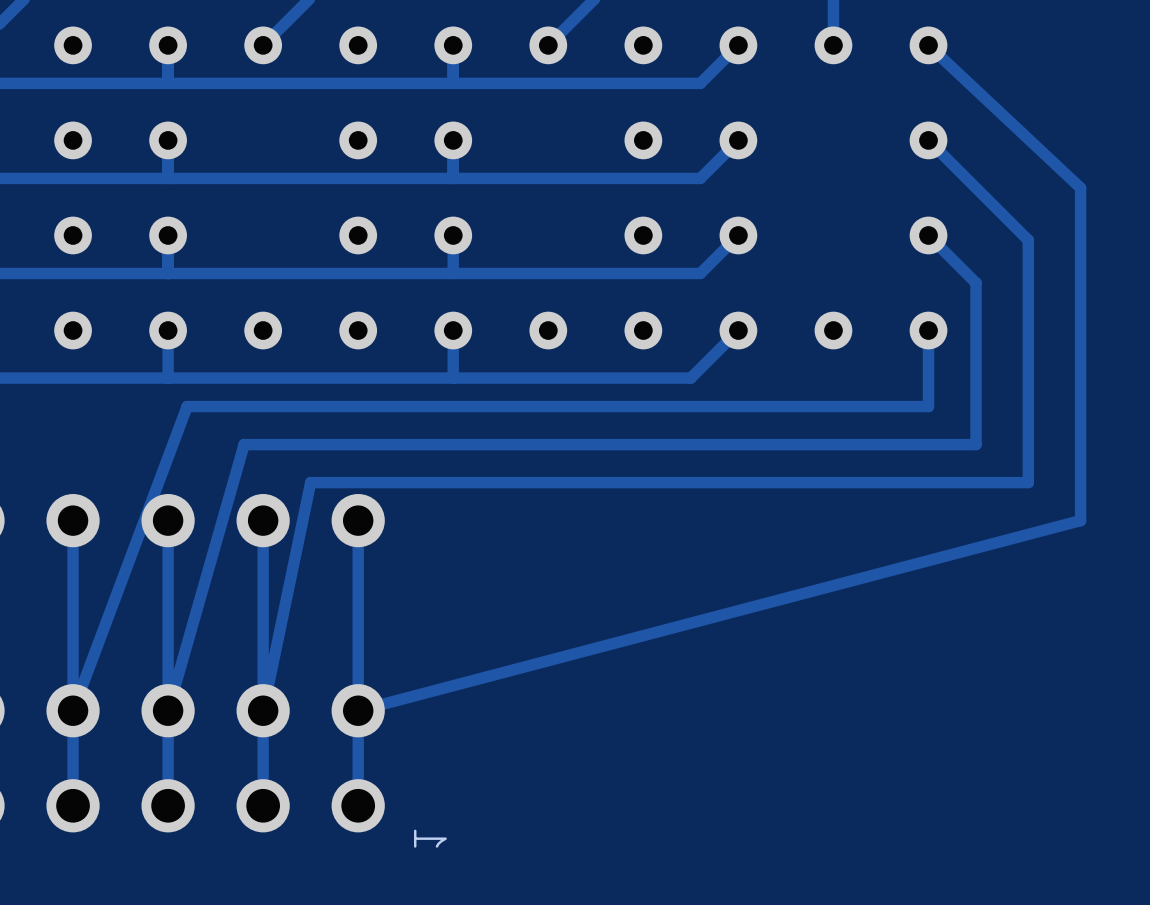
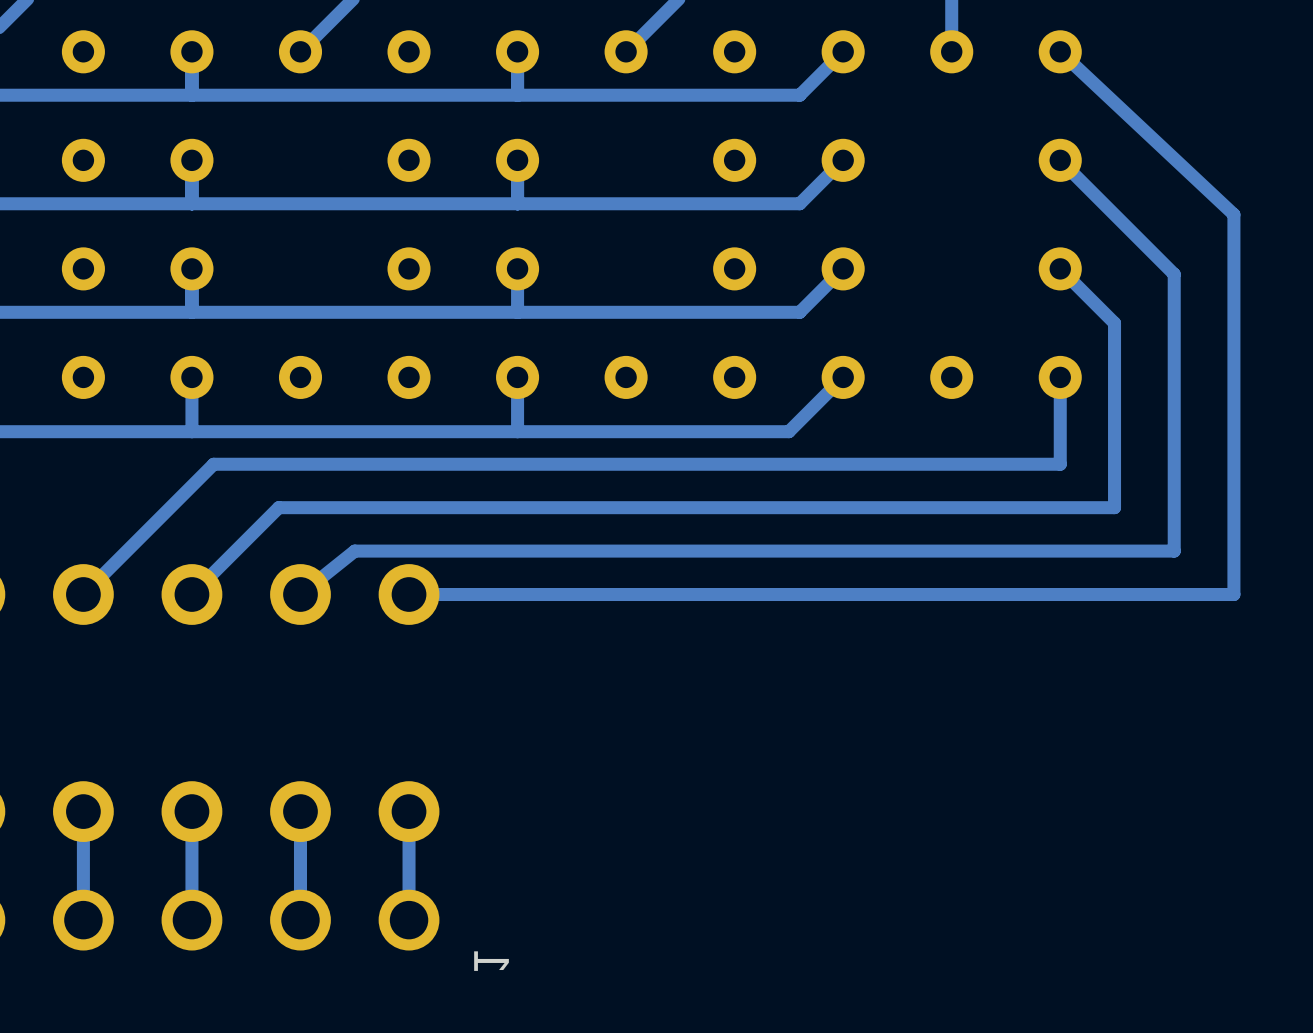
track: (187, 406) (73, 710) (73, 520) -> (213, 464) (83, 594)
track: (244, 444) (168, 710) (168, 520) -> (278, 507) (191, 594)
track: (310, 482) (263, 710) (263, 520) -> (354, 551) (300, 594)
track: (1080, 520) (358, 710) (358, 520) -> (1233, 594) (409, 594)

